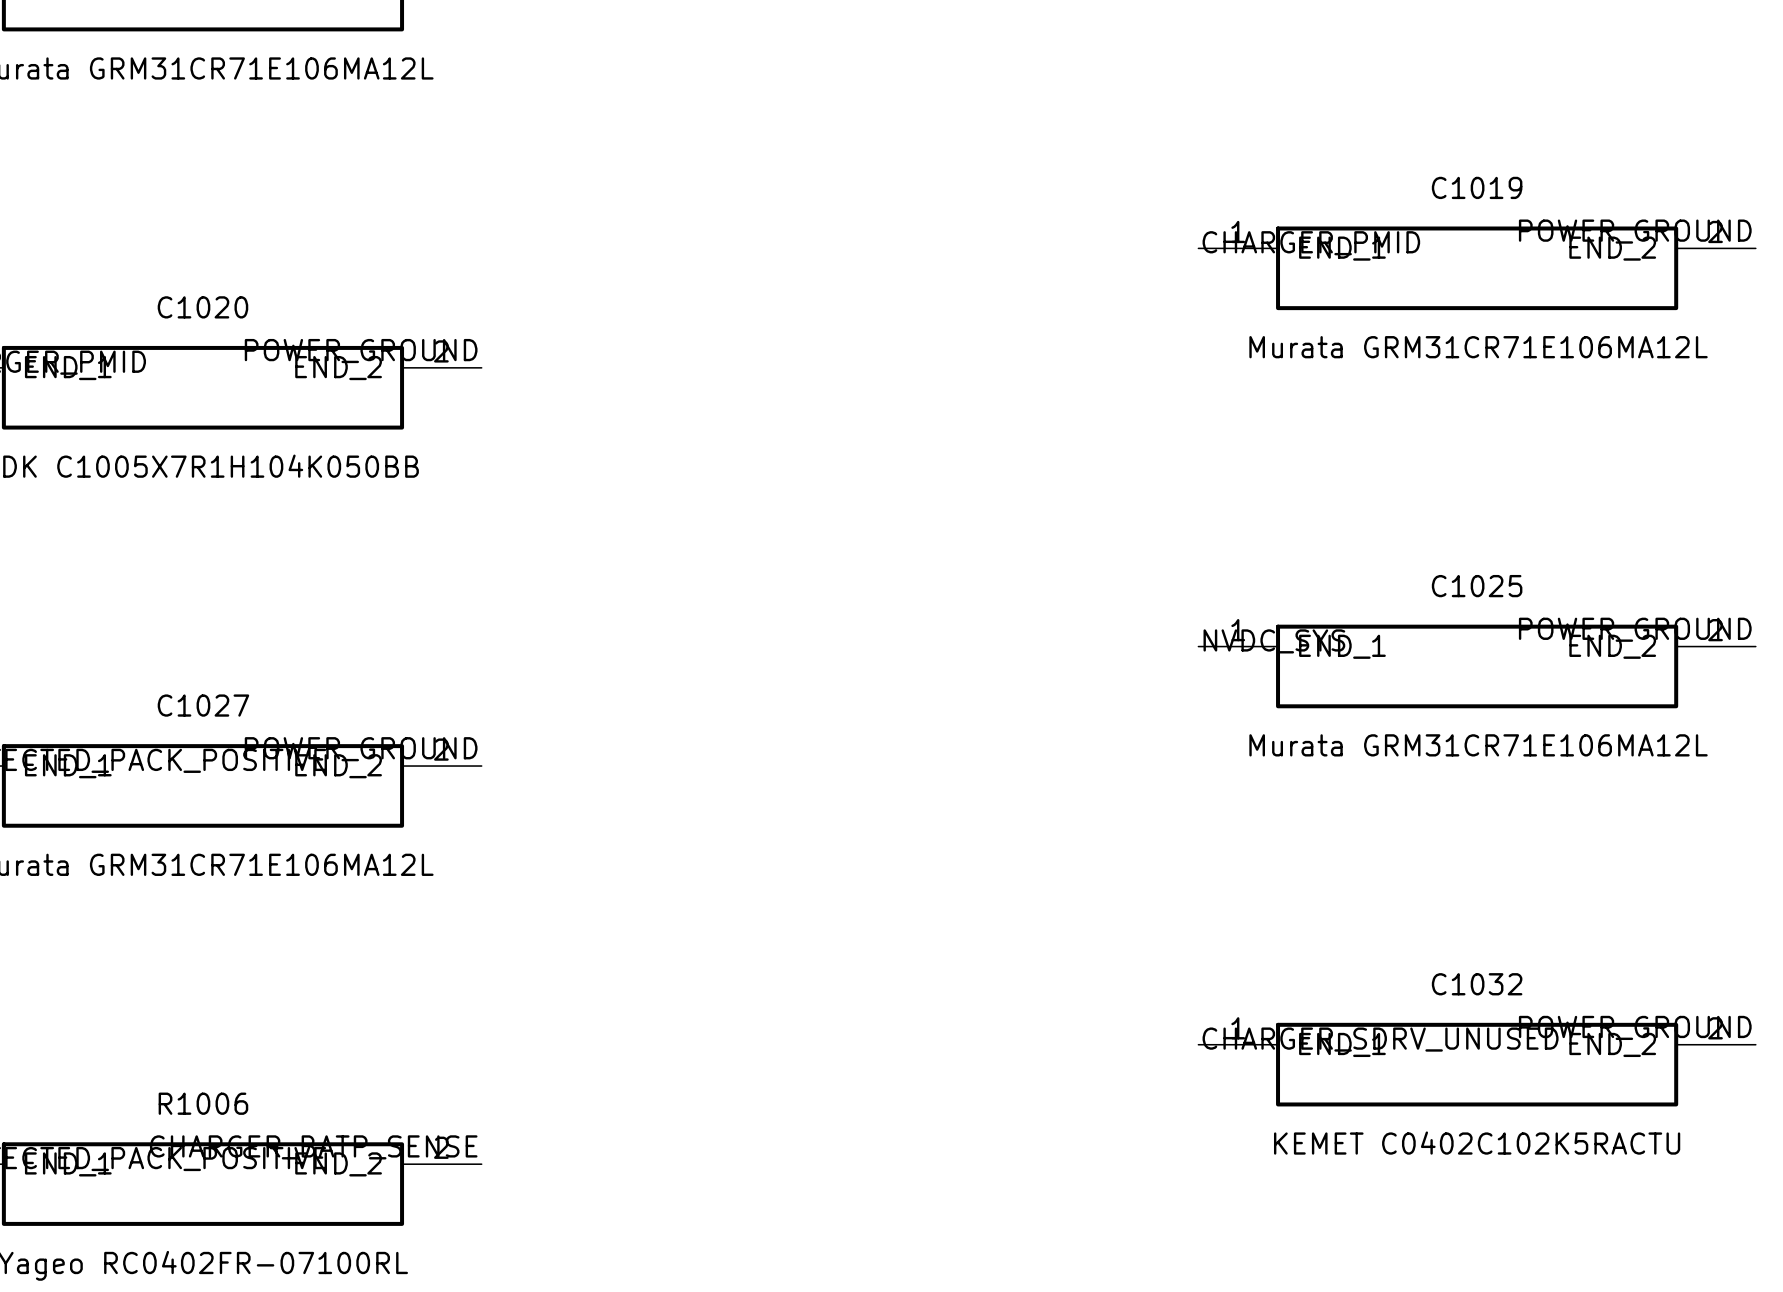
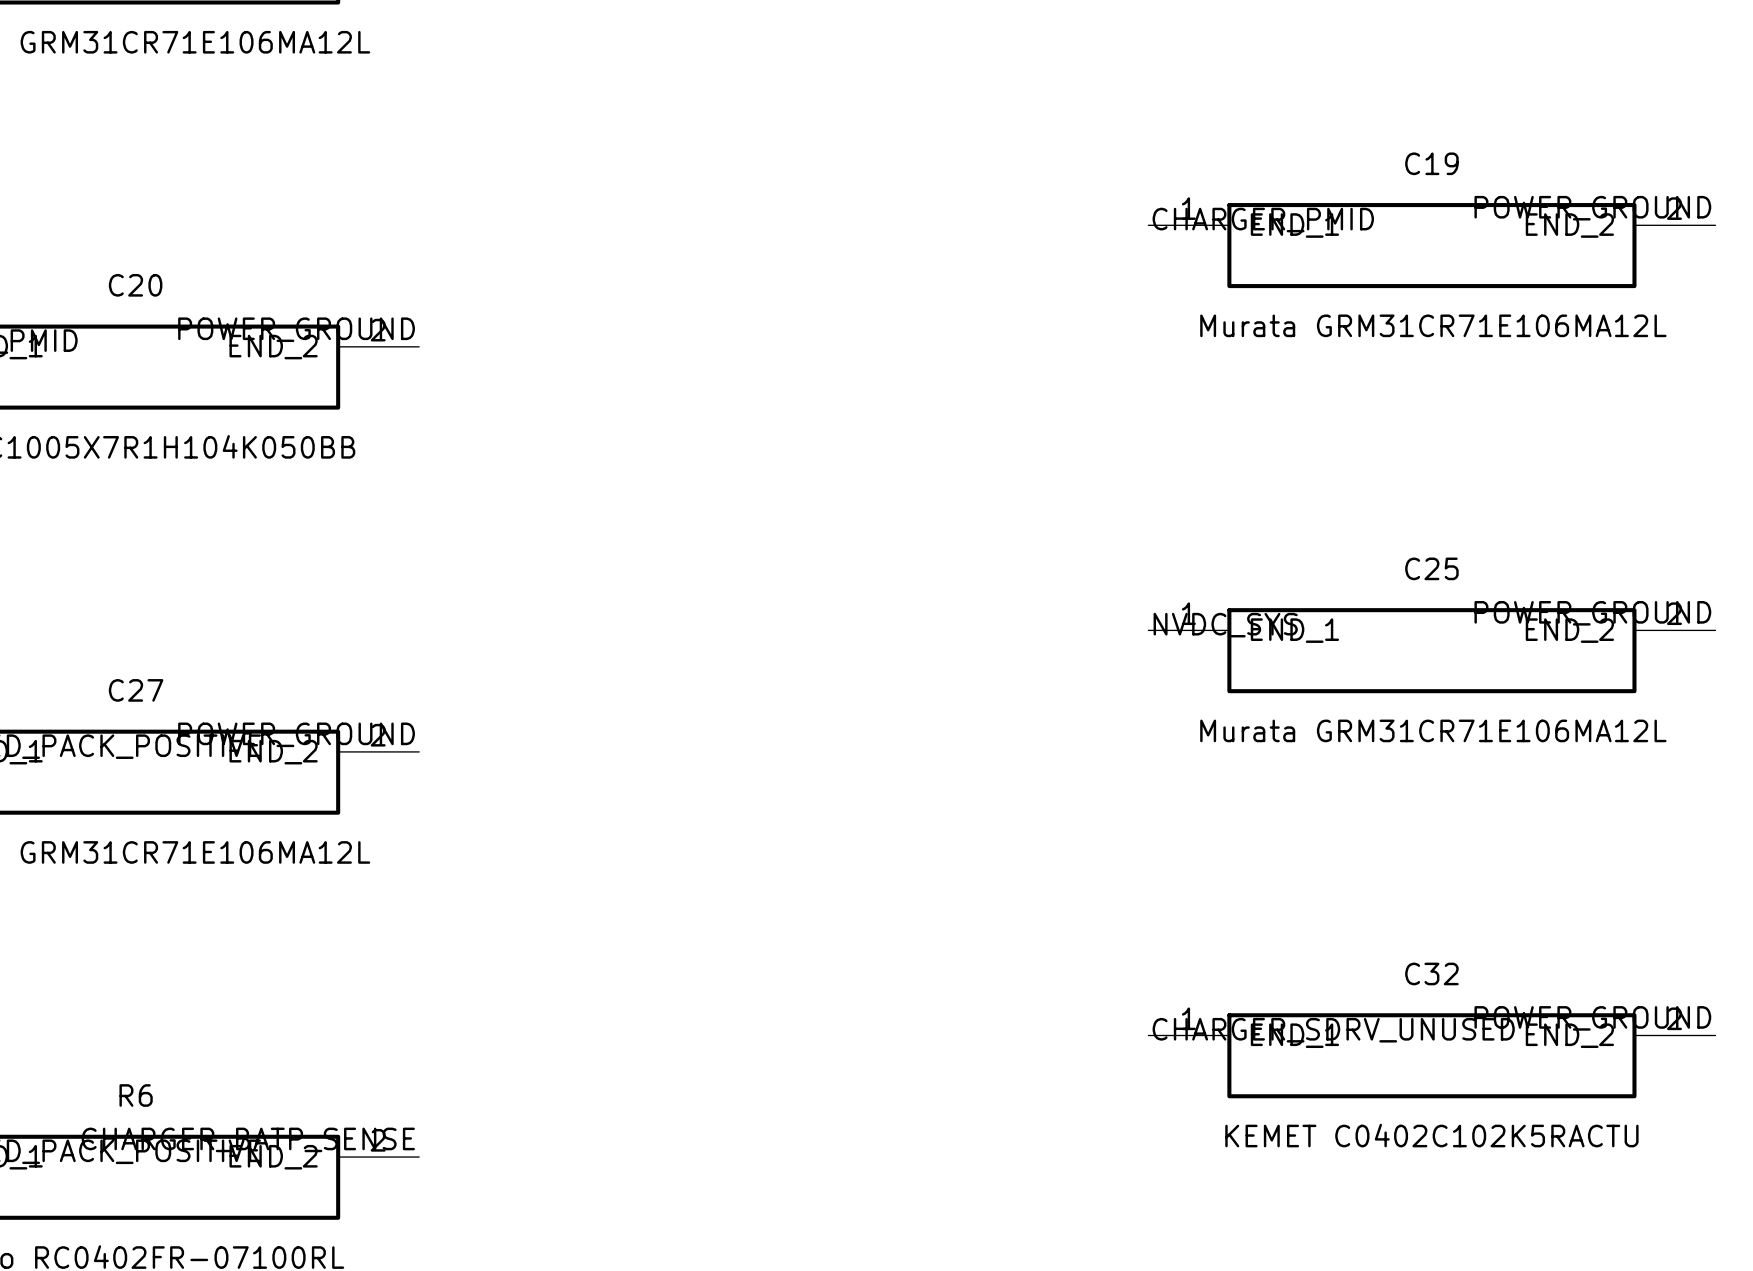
C1019 name: C1019 (1477, 187) -> C19 (1431, 163)
C1020 name: C1020 (202, 307) -> C20 (135, 285)
C1025 name: C1025 (1477, 586) -> C25 (1431, 568)
C1027 name: C1027 (203, 705) -> C27 (136, 690)
C1032 name: C1032 (1477, 984) -> C32 (1431, 973)
R1006 name: R1006 (203, 1103) -> R6 (136, 1095)

